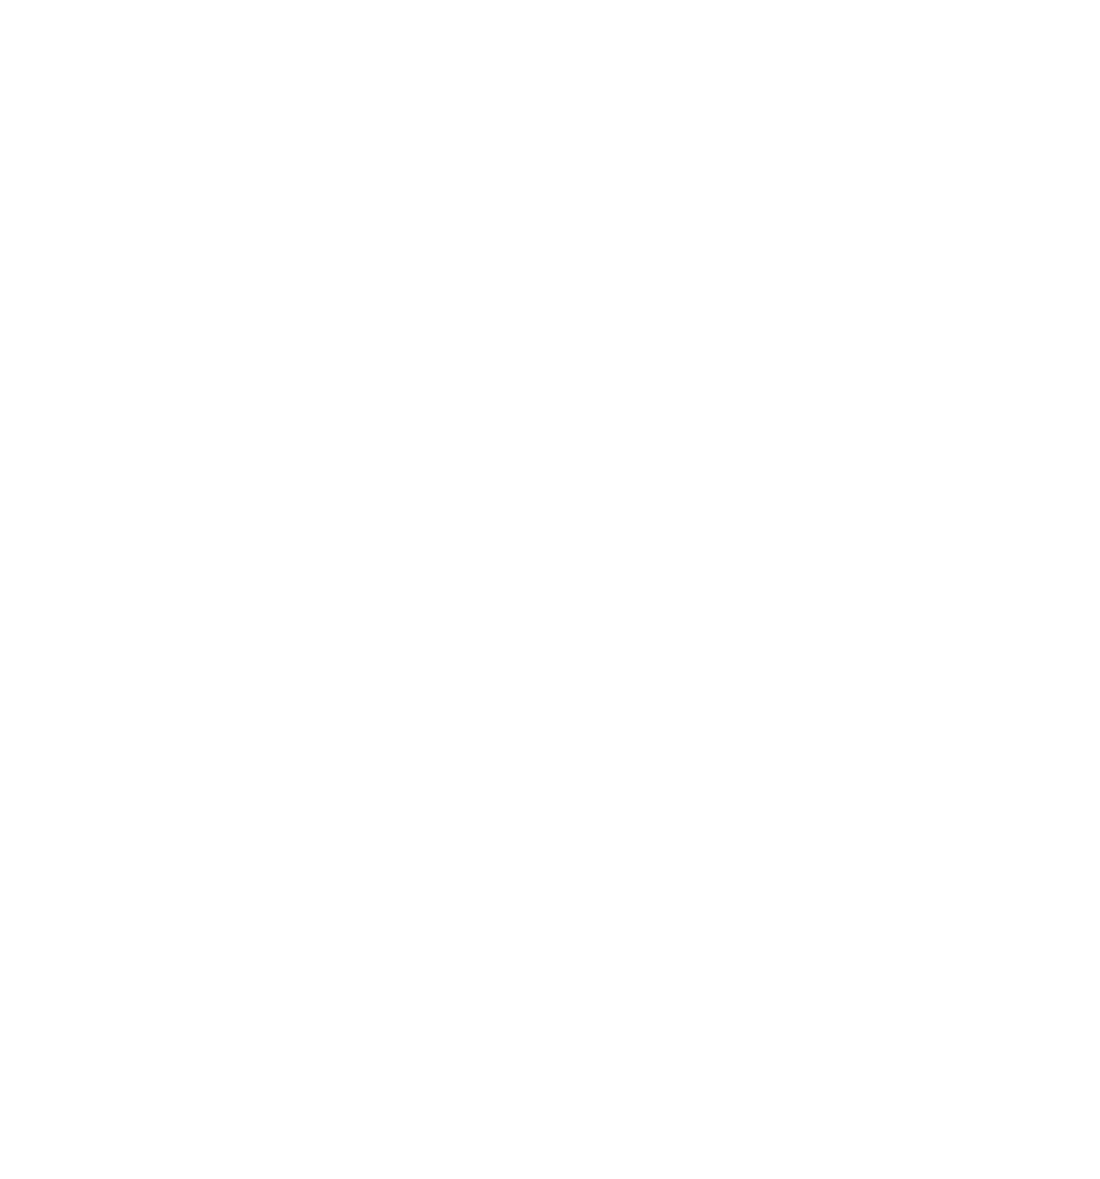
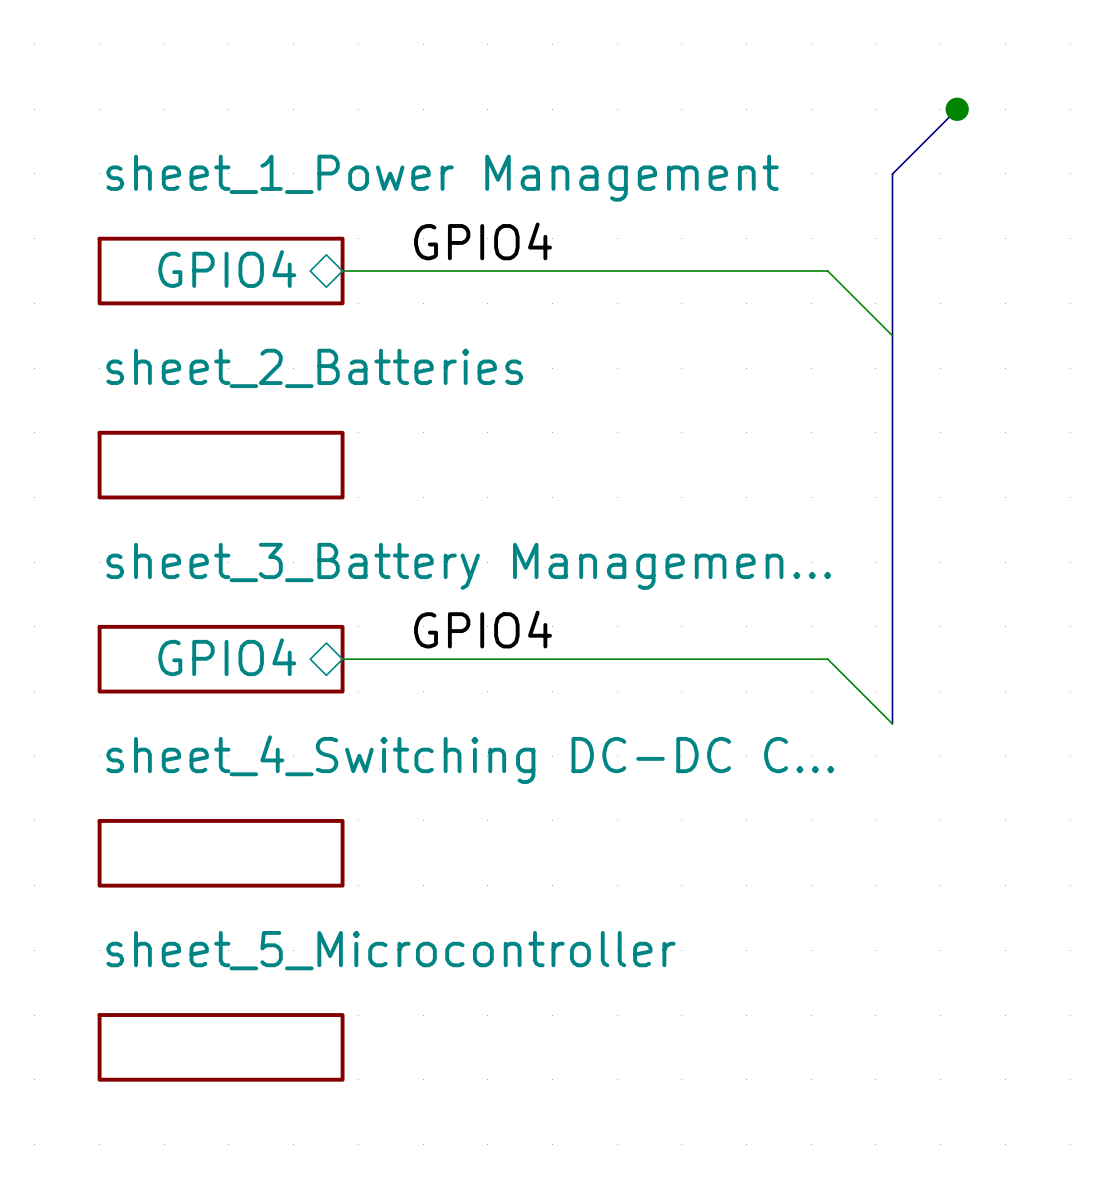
bus: none -> (957, 109) (892, 173) (892, 723)
junction: none -> (957, 109)
label: none -> GPIO4 (482, 241)
sheet pin: none -> GPIO4 (227, 269)
sheet sheet_1_Power Management: none -> (221, 271)
wire: none -> (342, 271) (827, 271) (892, 335)
sheet sheet_2_Batteries: none -> (221, 465)
label: none -> GPIO4 (482, 629)
sheet pin: none -> GPIO4 (227, 657)
sheet sheet_3_Battery Managemen...: none -> (221, 659)
wire: none -> (342, 659) (827, 659) (892, 723)
sheet sheet_4_Switching DC-DC C...: none -> (221, 853)
sheet sheet_5_Microcontroller: none -> (221, 1047)

